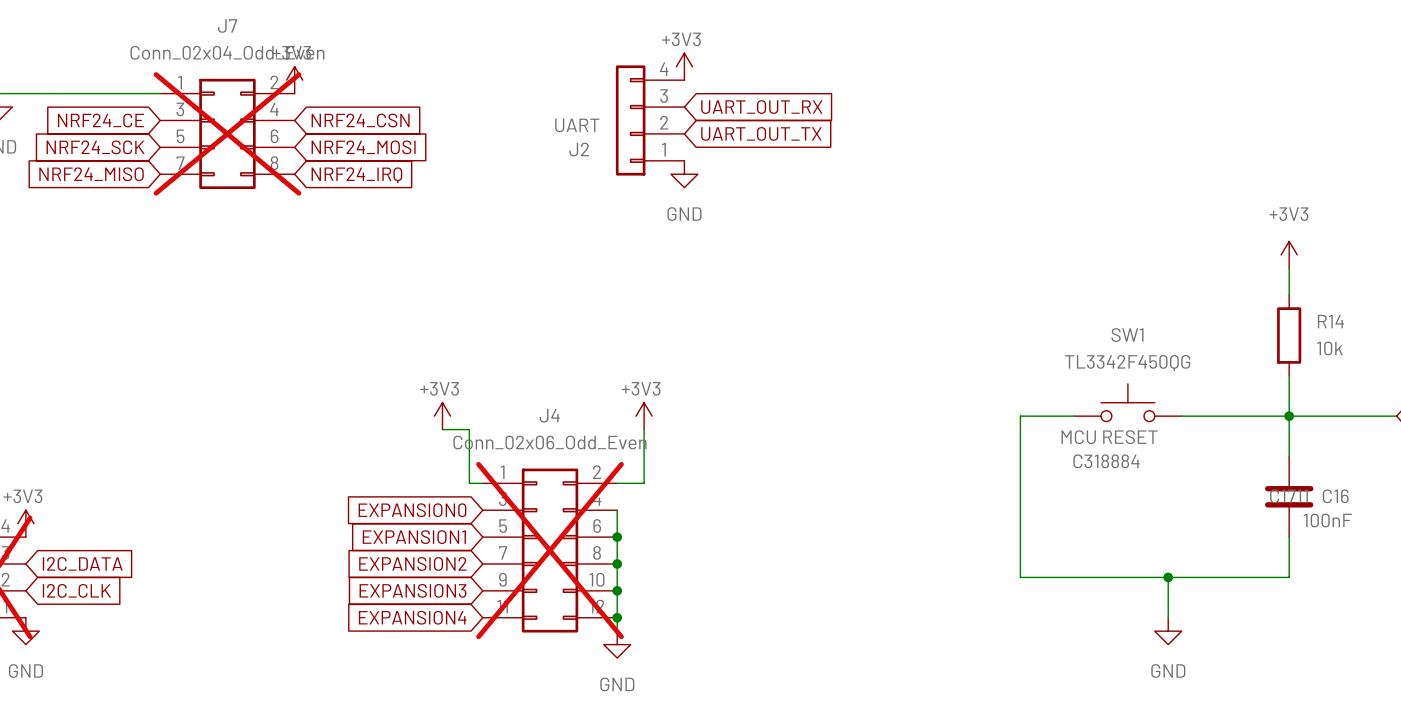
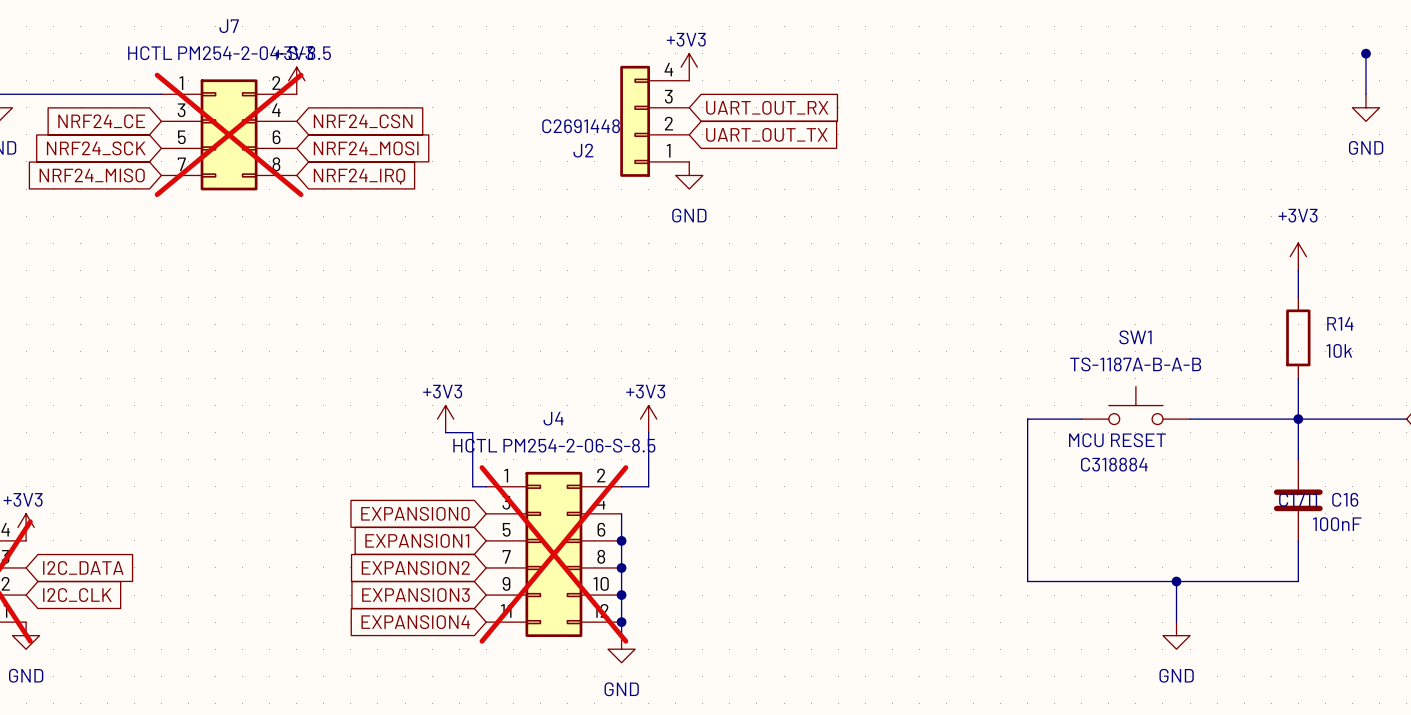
J7 value: Conn_02x04_Odd_Even (227, 52) -> HCTL PM254-2-04-S-8.5 (229, 53)
wire: none -> (1365, 53) (1365, 94)
junction: none -> (1365, 53)
power symbol: none -> GND (1365, 107)
J2 value: UART (577, 125) -> C2691448 (581, 126)
SW1 value: TL3342F450QG (1127, 362) -> TS-1187A-B-A-B (1135, 364)
J4 value: Conn_02x06_Odd_Even (549, 442) -> HCTL PM254-2-06-S-8.5 (554, 445)

